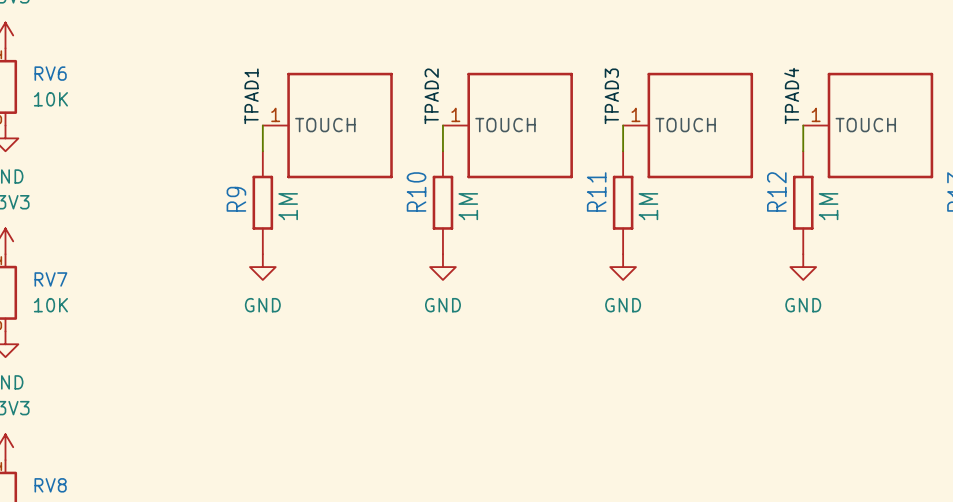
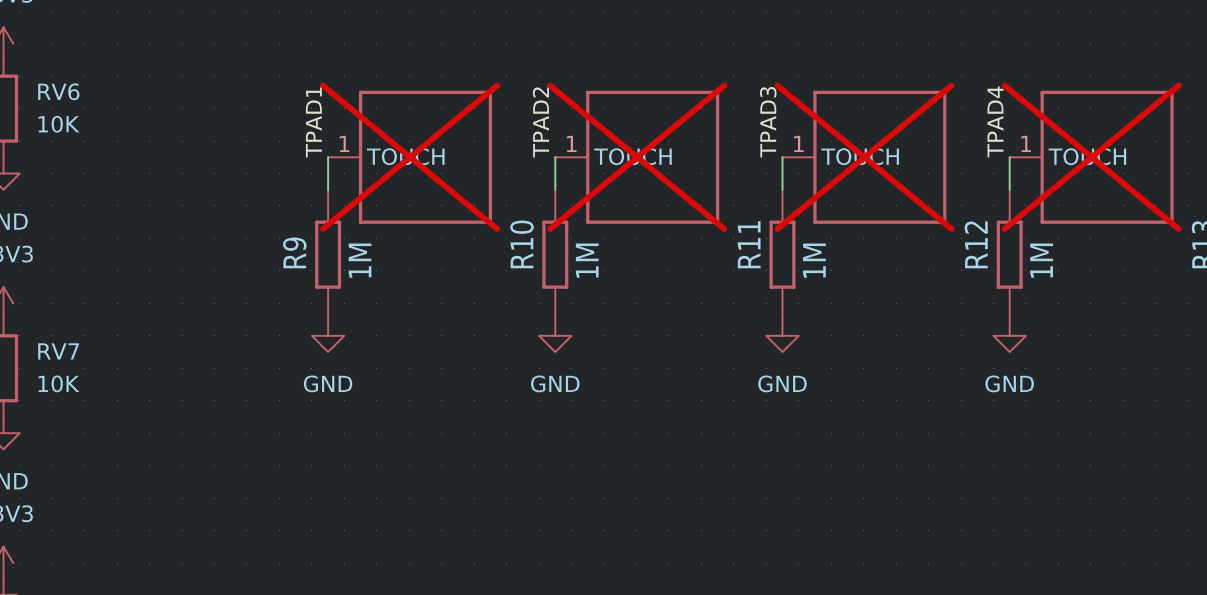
part do-not-place cross: none -> (410, 157)
part do-not-place cross: none -> (637, 157)
part do-not-place cross: none -> (864, 157)
part do-not-place cross: none -> (1091, 157)

